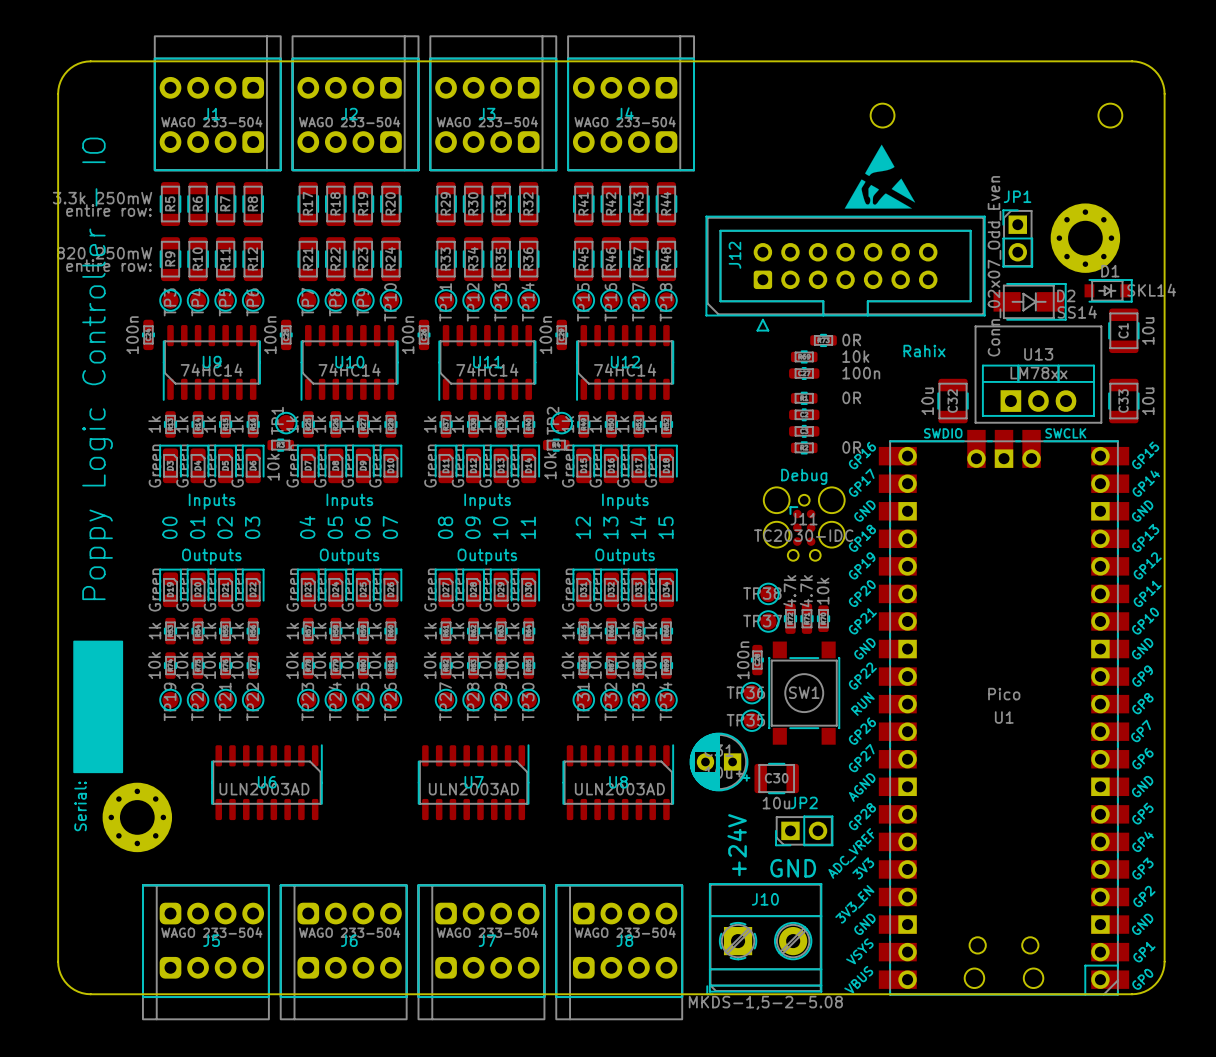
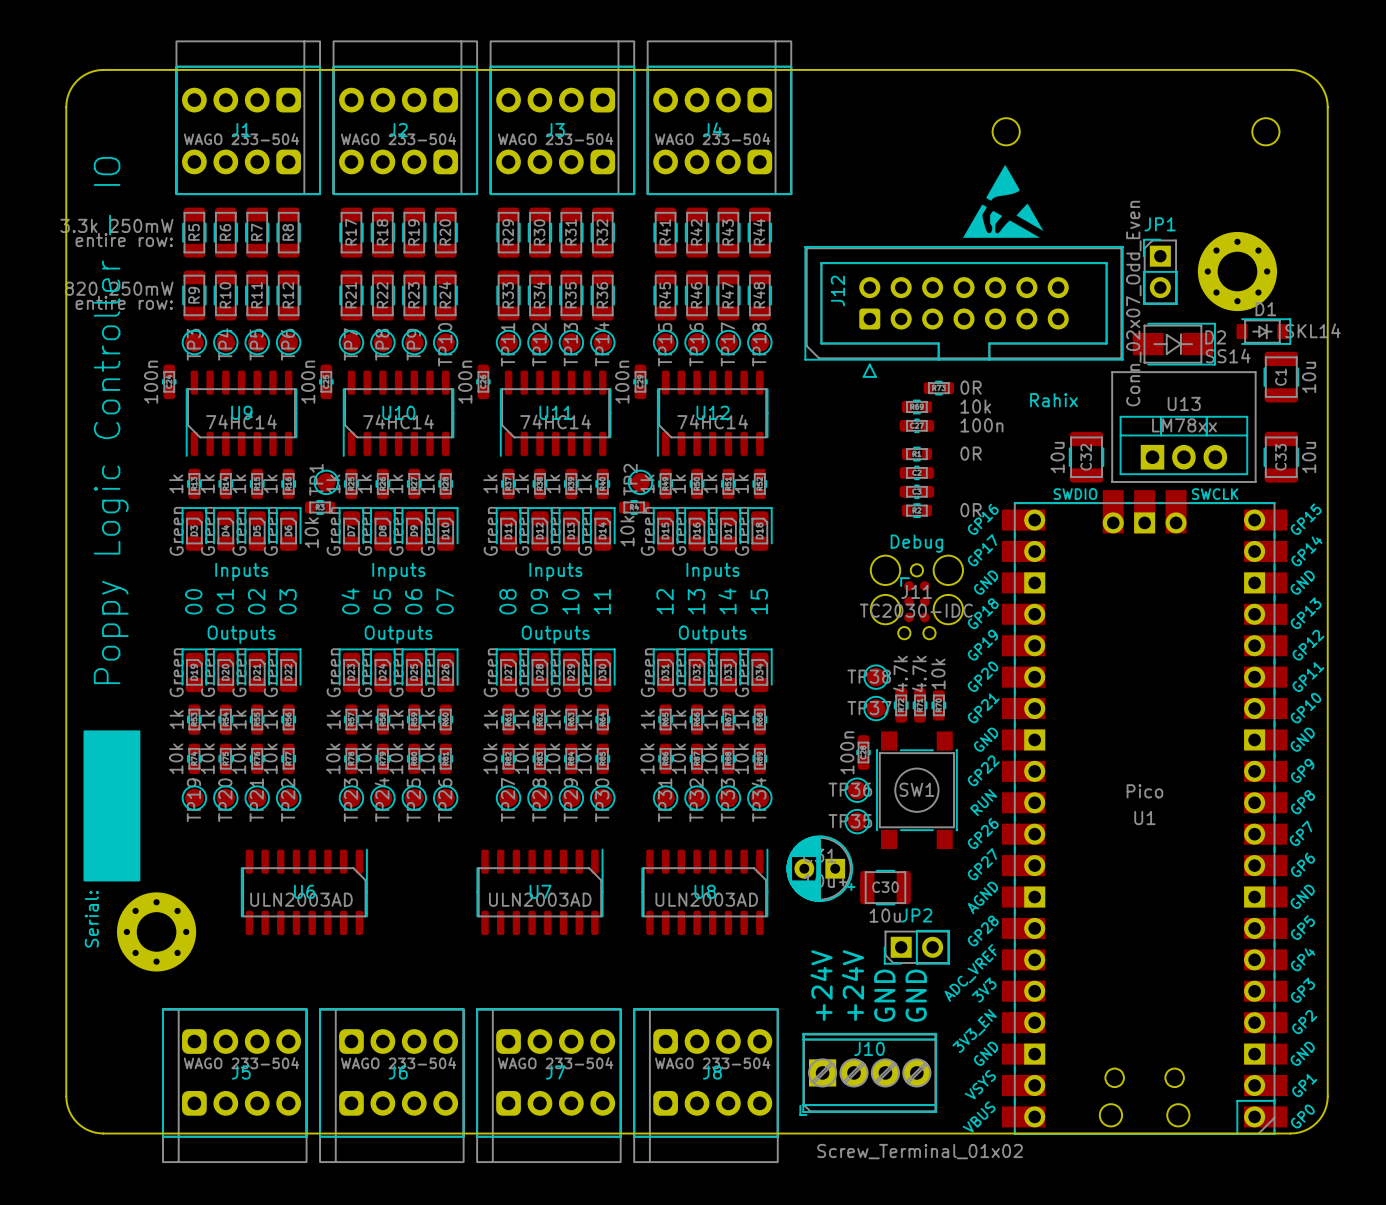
text: +24V (737, 845) -> none
text: none -> +24V (821, 985)
text: none -> +24V (852, 985)
text: GND (793, 868) -> none
text: none -> GND (884, 995)
text: none -> GND (916, 995)
J10 footprint: [706, 883, 823, 995] -> [799, 1033, 937, 1116]
J10 value: MKDS-1,5-2-5.08 (765, 1002) -> Screw_Terminal_01x02 (920, 1151)

